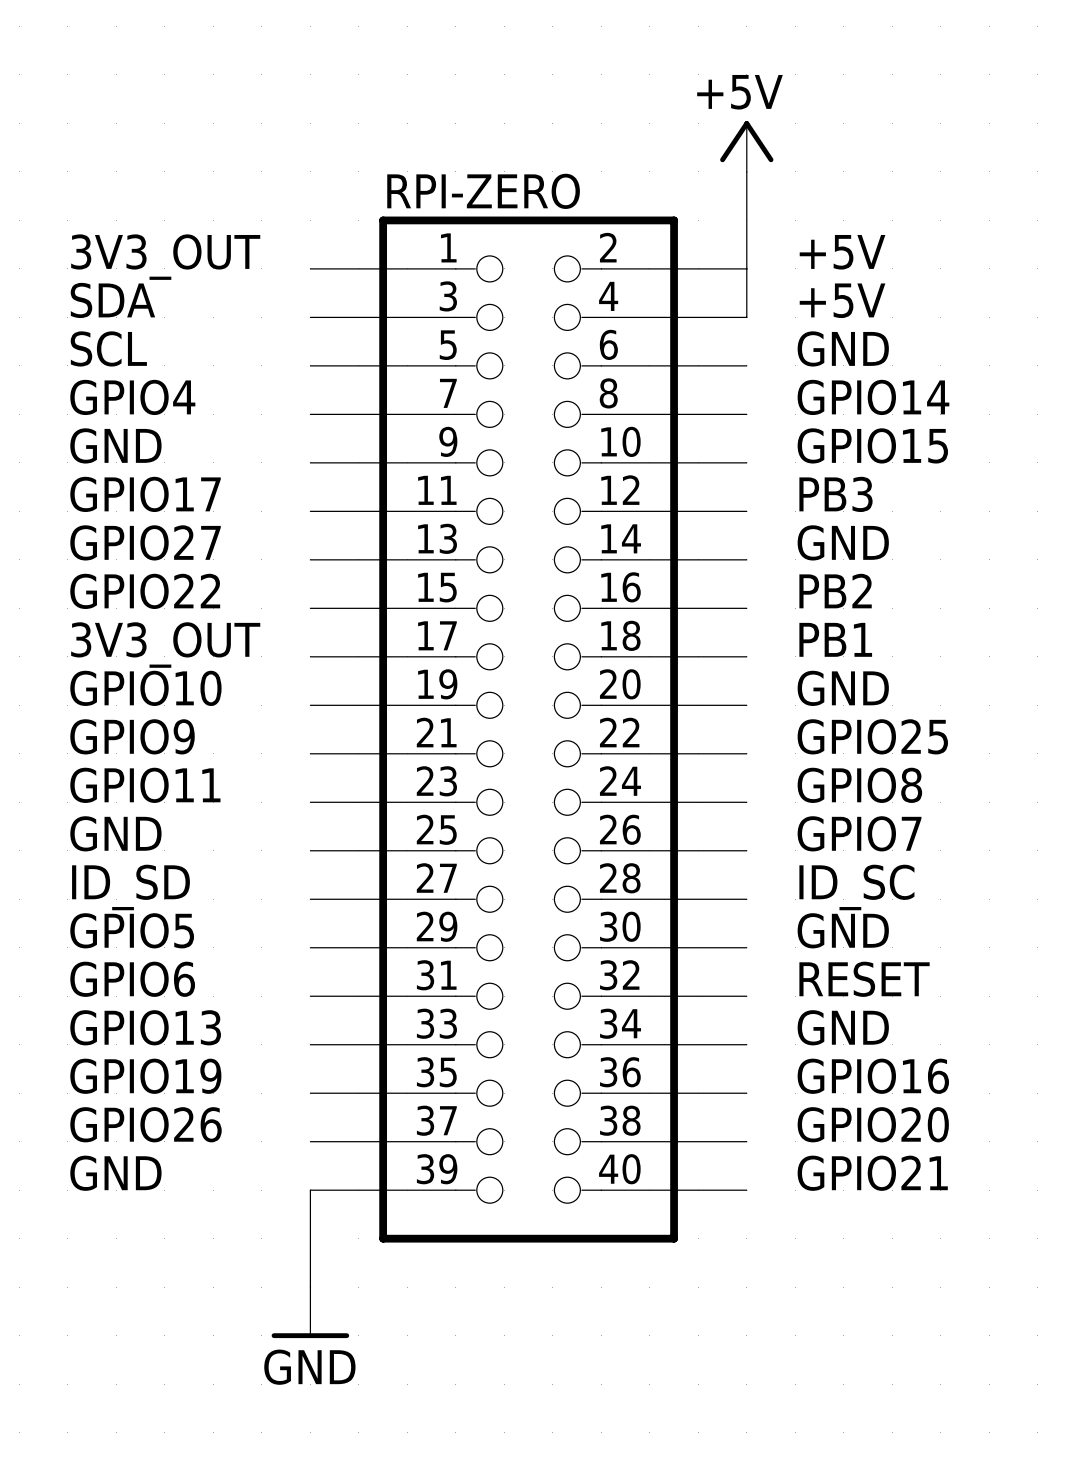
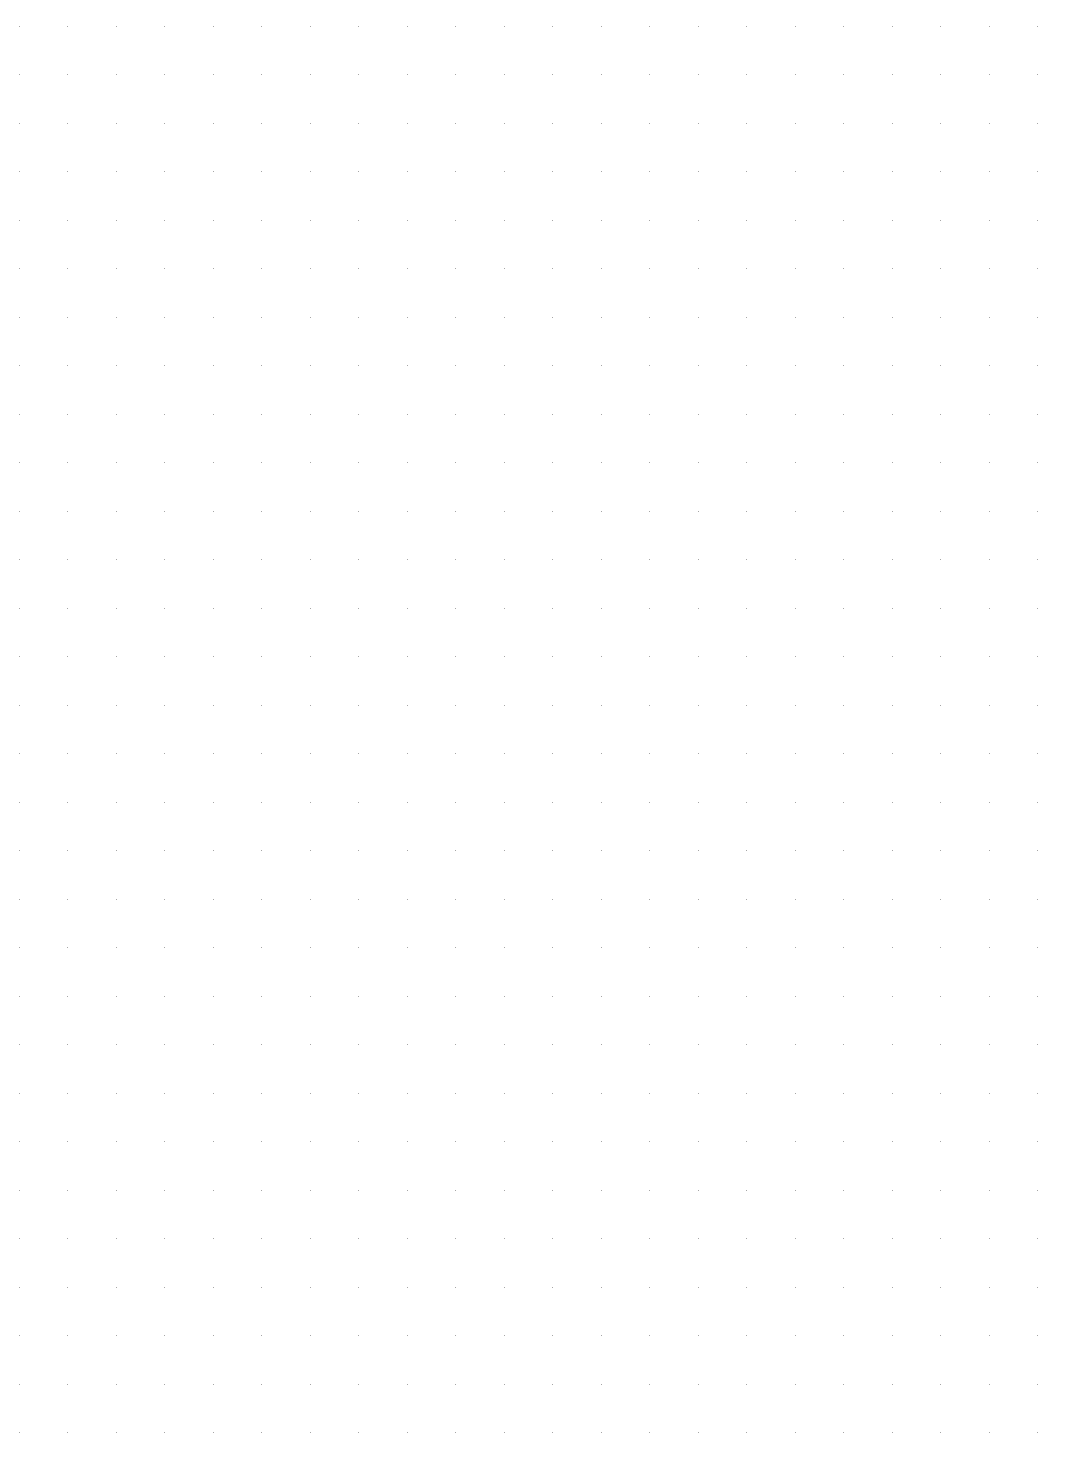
power symbol: +5V (746, 146) -> none
wire: (746, 171) (746, 317) (601, 317) -> none
label: +5V (842, 252) -> none
label: 3V3_OUT (165, 257) -> none
wire: (310, 268) (455, 268) -> none
wire: (601, 268) (746, 268) -> none
label: SDA (112, 300) -> none
label: +5V (842, 300) -> none
wire: (310, 317) (455, 317) -> none
label: SCL (108, 348) -> none
label: GND (843, 348) -> none
wire: (310, 365) (455, 365) -> none
wire: (601, 365) (746, 365) -> none
label: GPIO4 (132, 397) -> none
label: GPIO14 (873, 397) -> none
wire: (310, 414) (455, 414) -> none
wire: (601, 414) (746, 414) -> none
label: GND (115, 445) -> none
label: GPIO15 (872, 445) -> none
wire: (310, 462) (455, 462) -> none
wire: (601, 462) (746, 462) -> none
label: GPIO17 (145, 494) -> none
label: PB3 (835, 494) -> none
wire: (310, 511) (455, 511) -> none
wire: (601, 511) (746, 511) -> none
label: GPIO27 (145, 542) -> none
label: GND (843, 542) -> none
wire: (310, 559) (455, 559) -> none
wire: (601, 559) (746, 559) -> none
label: GPIO22 (145, 591) -> none
label: PB2 (835, 591) -> none
wire: (310, 608) (455, 608) -> none
wire: (601, 608) (746, 608) -> none
label: PB1 (835, 639) -> none
label: 3V3_OUT (165, 645) -> none
wire: (310, 656) (455, 656) -> none
wire: (601, 656) (746, 656) -> none
label: GPIO10 (145, 688) -> none
label: GND (843, 688) -> none
wire: (310, 705) (455, 705) -> none
wire: (601, 705) (746, 705) -> none
RPI-ZERO: (528, 729) -> none
label: GPIO9 (132, 736) -> none
label: GPIO25 (872, 736) -> none
wire: (310, 753) (455, 753) -> none
wire: (601, 753) (746, 753) -> none
label: GPIO11 (145, 785) -> none
label: GPIO8 (859, 785) -> none
wire: (310, 802) (455, 802) -> none
wire: (601, 802) (746, 802) -> none
label: GND (115, 833) -> none
label: GPIO7 (859, 833) -> none
wire: (310, 850) (455, 850) -> none
wire: (601, 850) (746, 850) -> none
label: ID_SD (130, 887) -> none
label: ID_SC (856, 887) -> none
wire: (310, 899) (455, 899) -> none
wire: (601, 899) (746, 899) -> none
label: GPIO5 (132, 930) -> none
label: GND (843, 930) -> none
wire: (310, 947) (455, 947) -> none
wire: (601, 947) (746, 947) -> none
label: GPIO6 (132, 979) -> none
label: RESET (864, 979) -> none
wire: (310, 996) (455, 996) -> none
wire: (601, 996) (746, 996) -> none
label: GPIO13 (145, 1027) -> none
label: GND (843, 1027) -> none
wire: (310, 1044) (455, 1044) -> none
wire: (601, 1044) (746, 1044) -> none
label: GPIO19 (145, 1076) -> none
label: GPIO16 (873, 1076) -> none
wire: (310, 1093) (455, 1093) -> none
wire: (601, 1093) (746, 1093) -> none
label: GPIO26 (146, 1124) -> none
label: GPIO20 (873, 1124) -> none
wire: (310, 1141) (455, 1141) -> none
wire: (601, 1141) (746, 1141) -> none
label: GND (115, 1173) -> none
label: GPIO21 (872, 1173) -> none
wire: (455, 1190) (310, 1190) (310, 1287) -> none
wire: (601, 1190) (746, 1190) -> none
power symbol: GND (310, 1312) -> none

